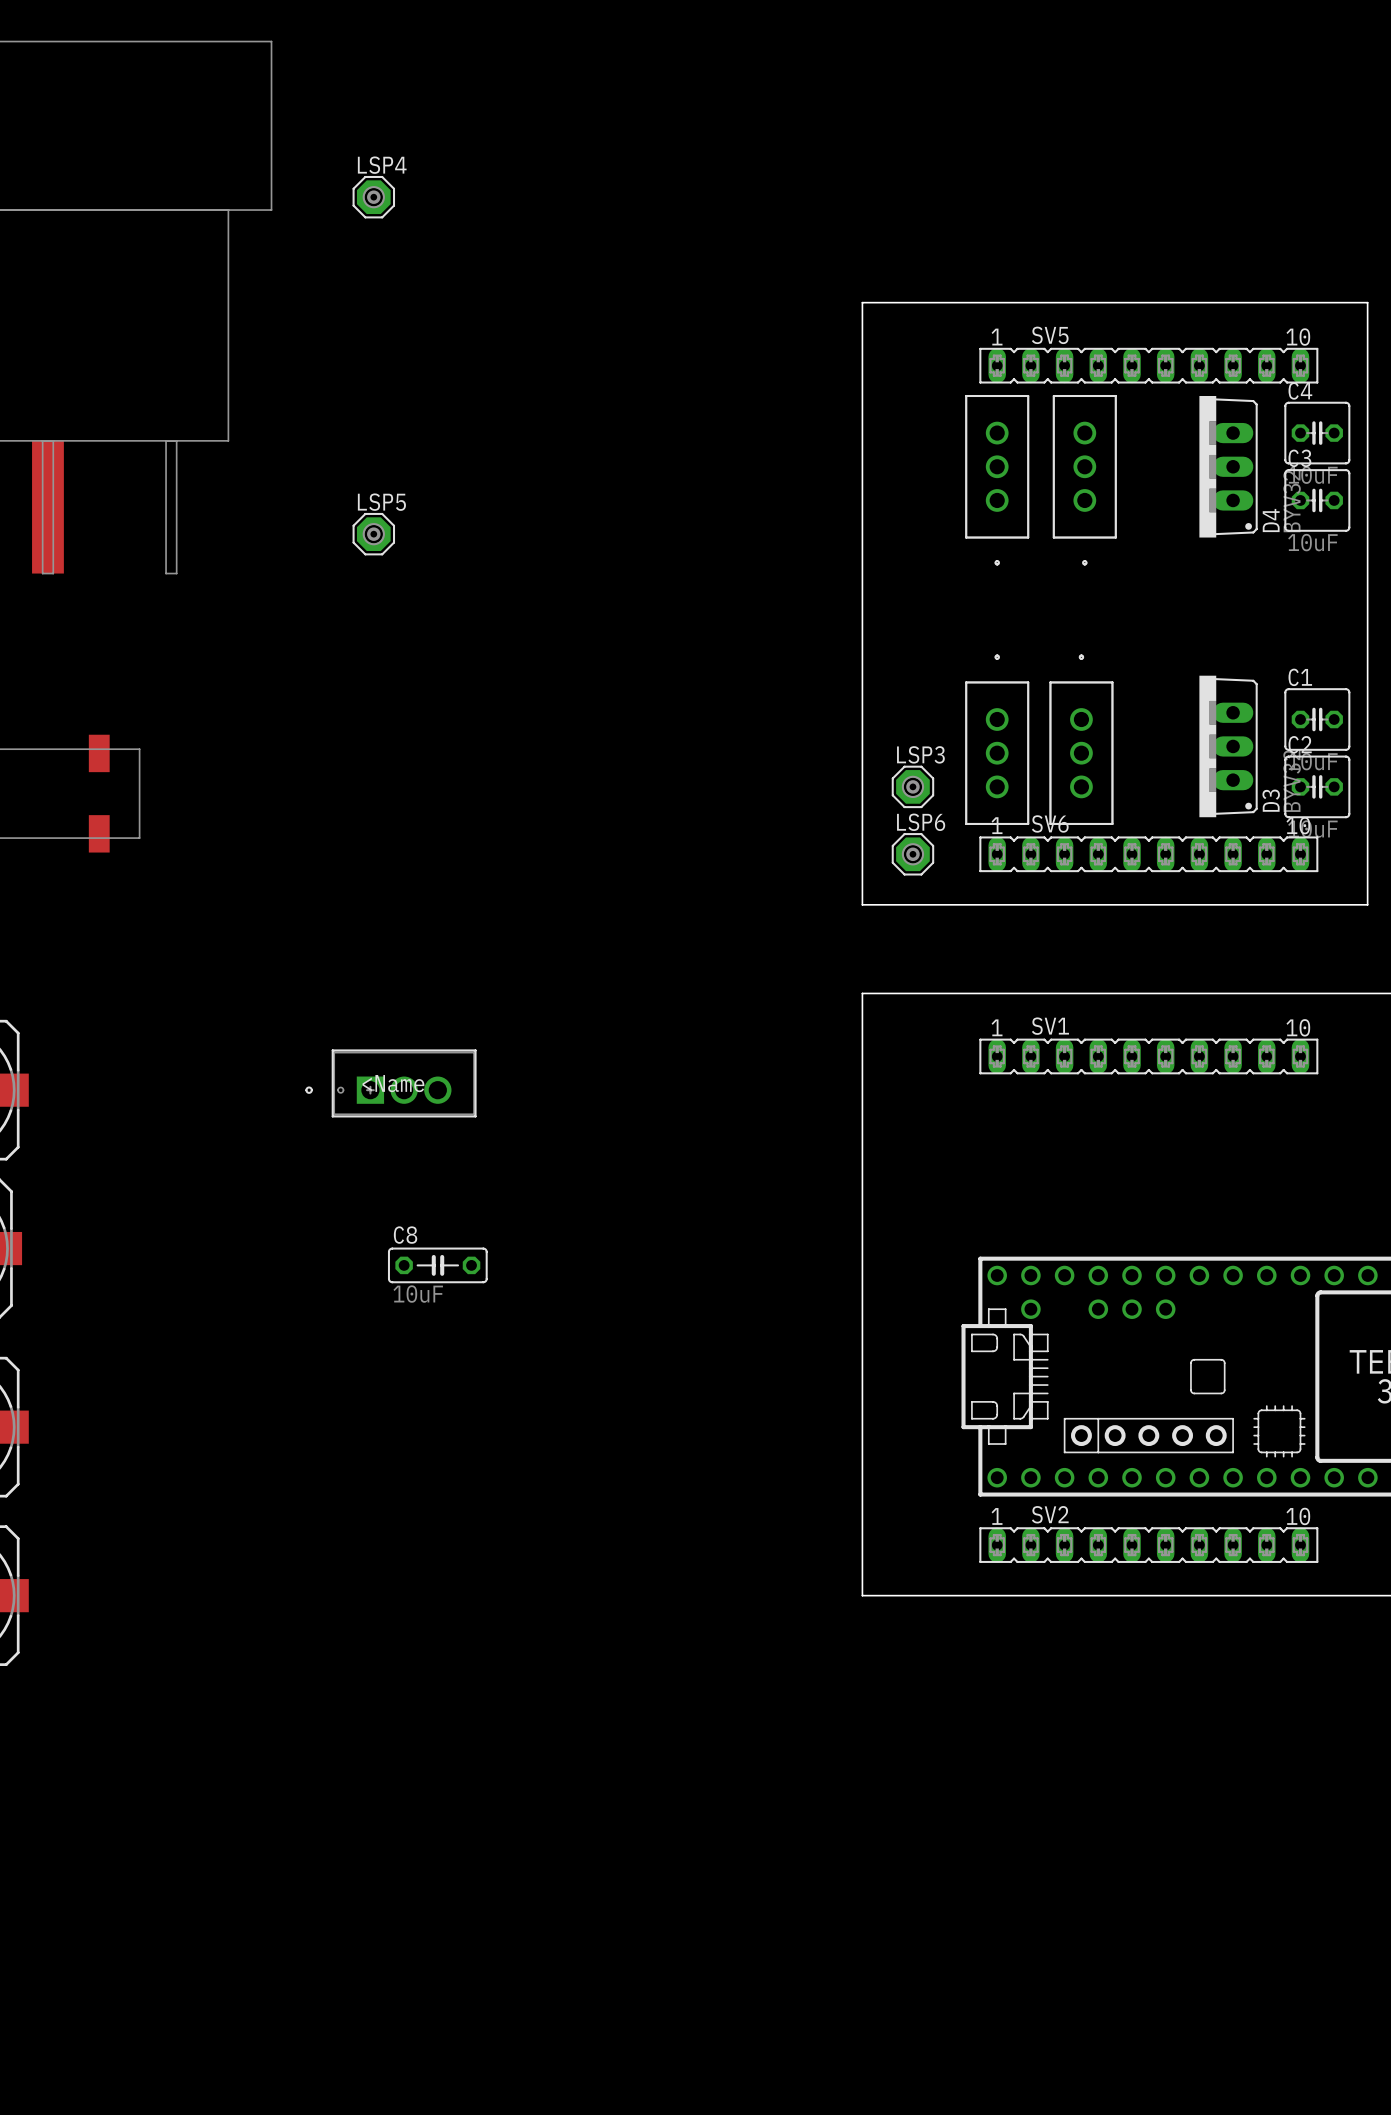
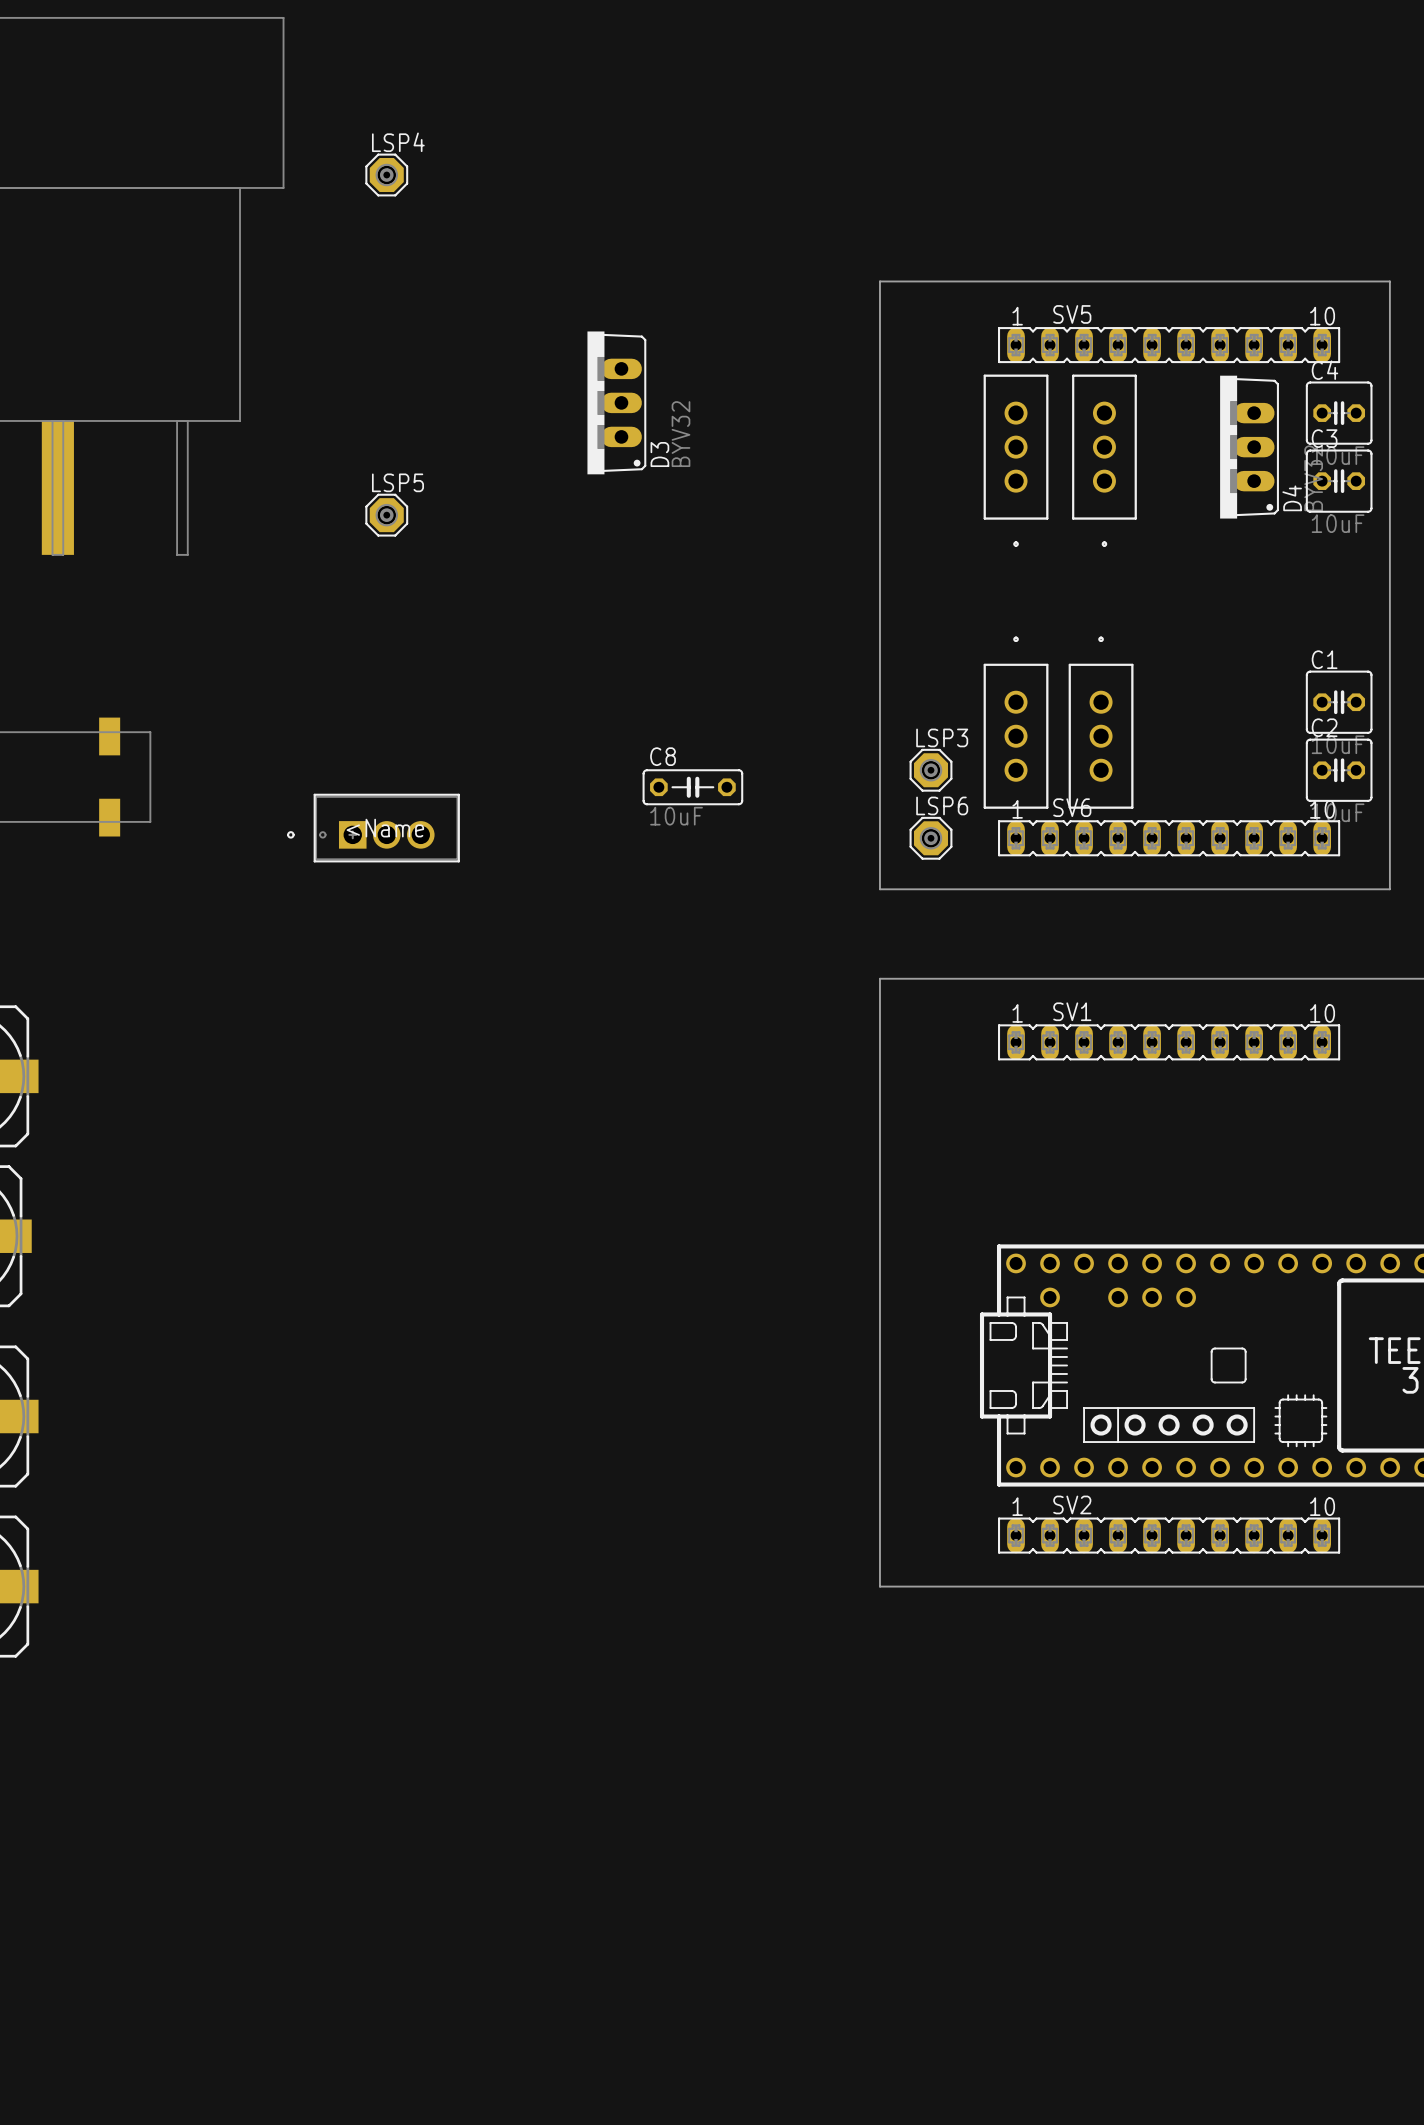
D3 position: (1228, 746) -> (616, 402)
part position: (390, 1083) -> (373, 828)
C8 position: (437, 1265) -> (692, 787)

